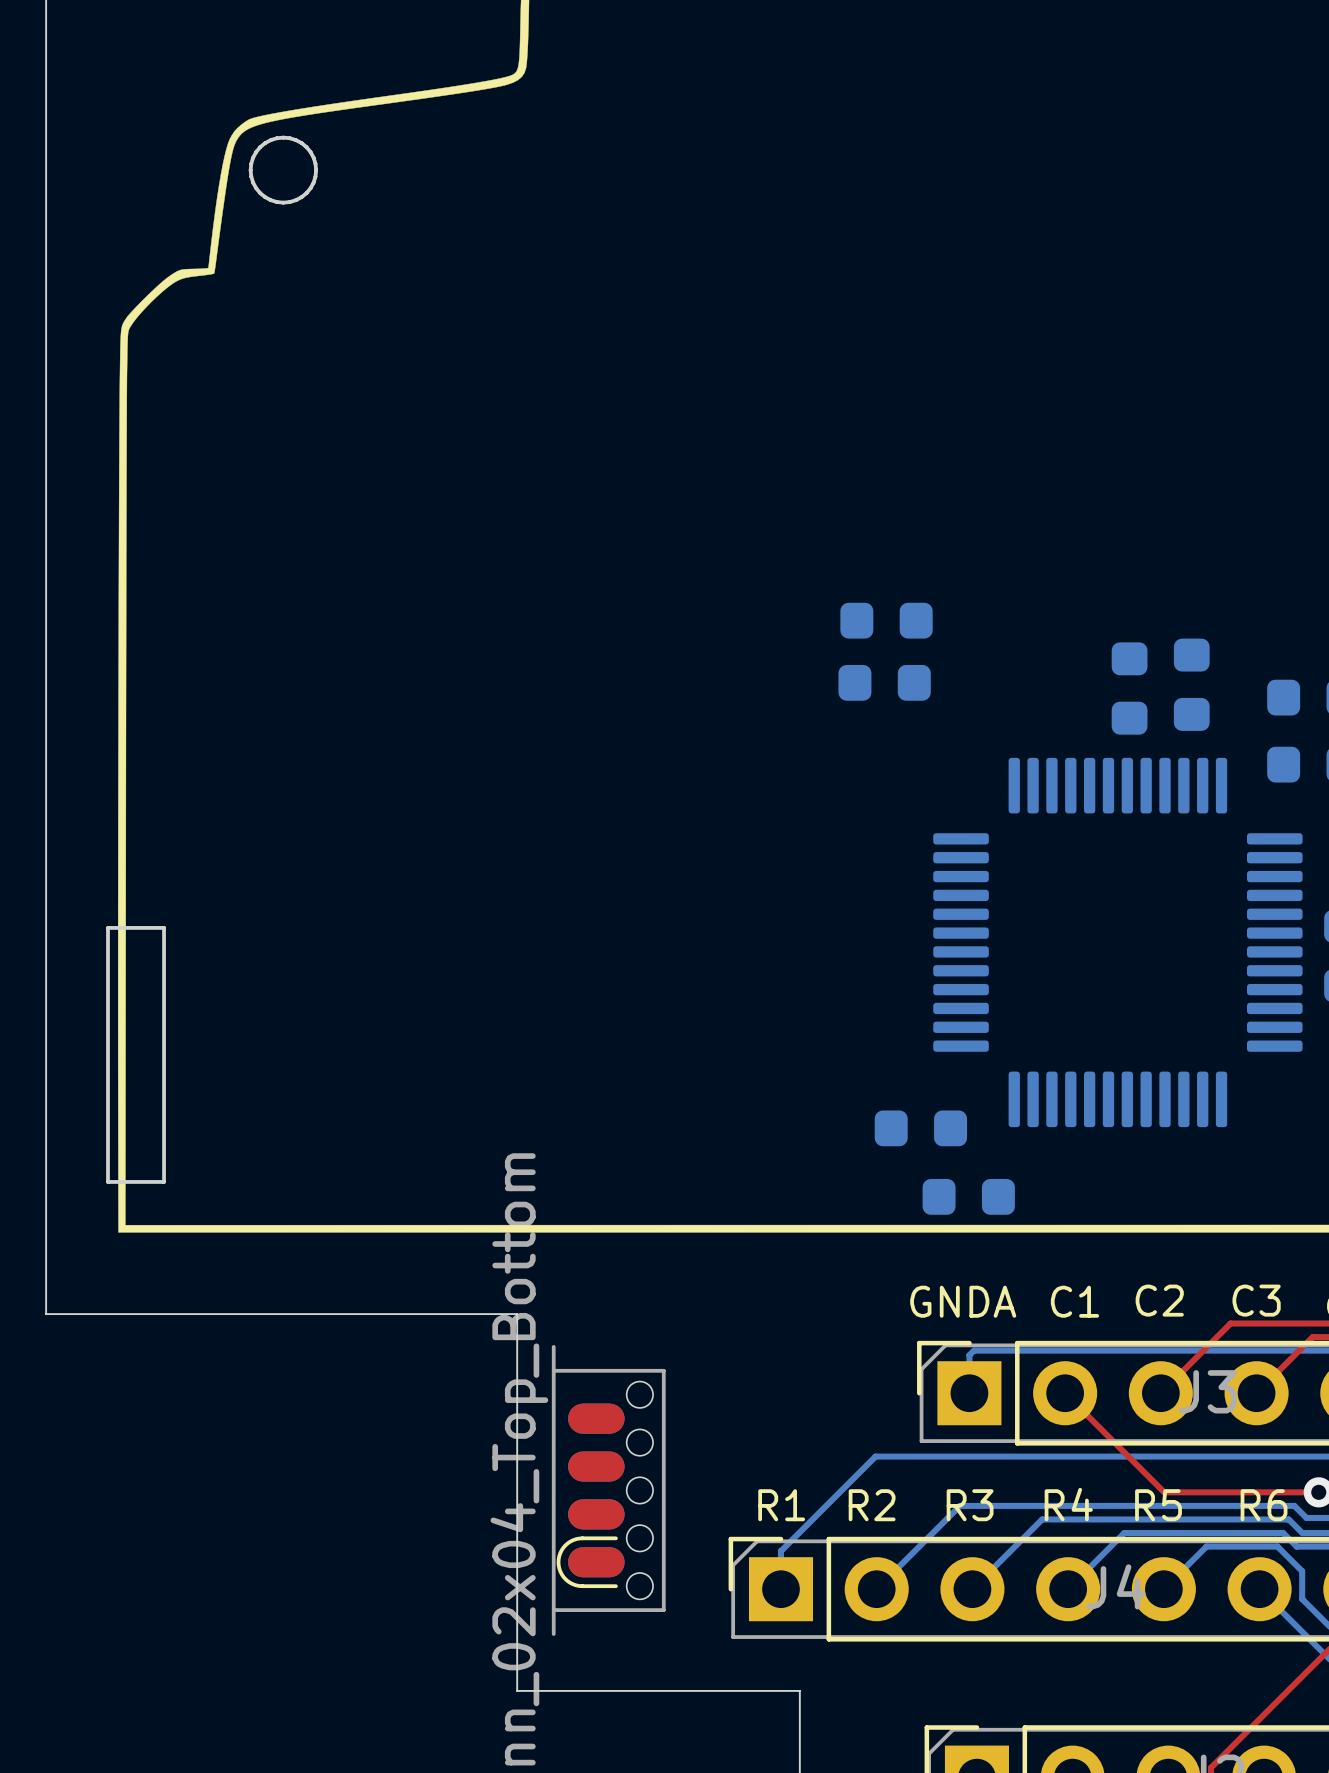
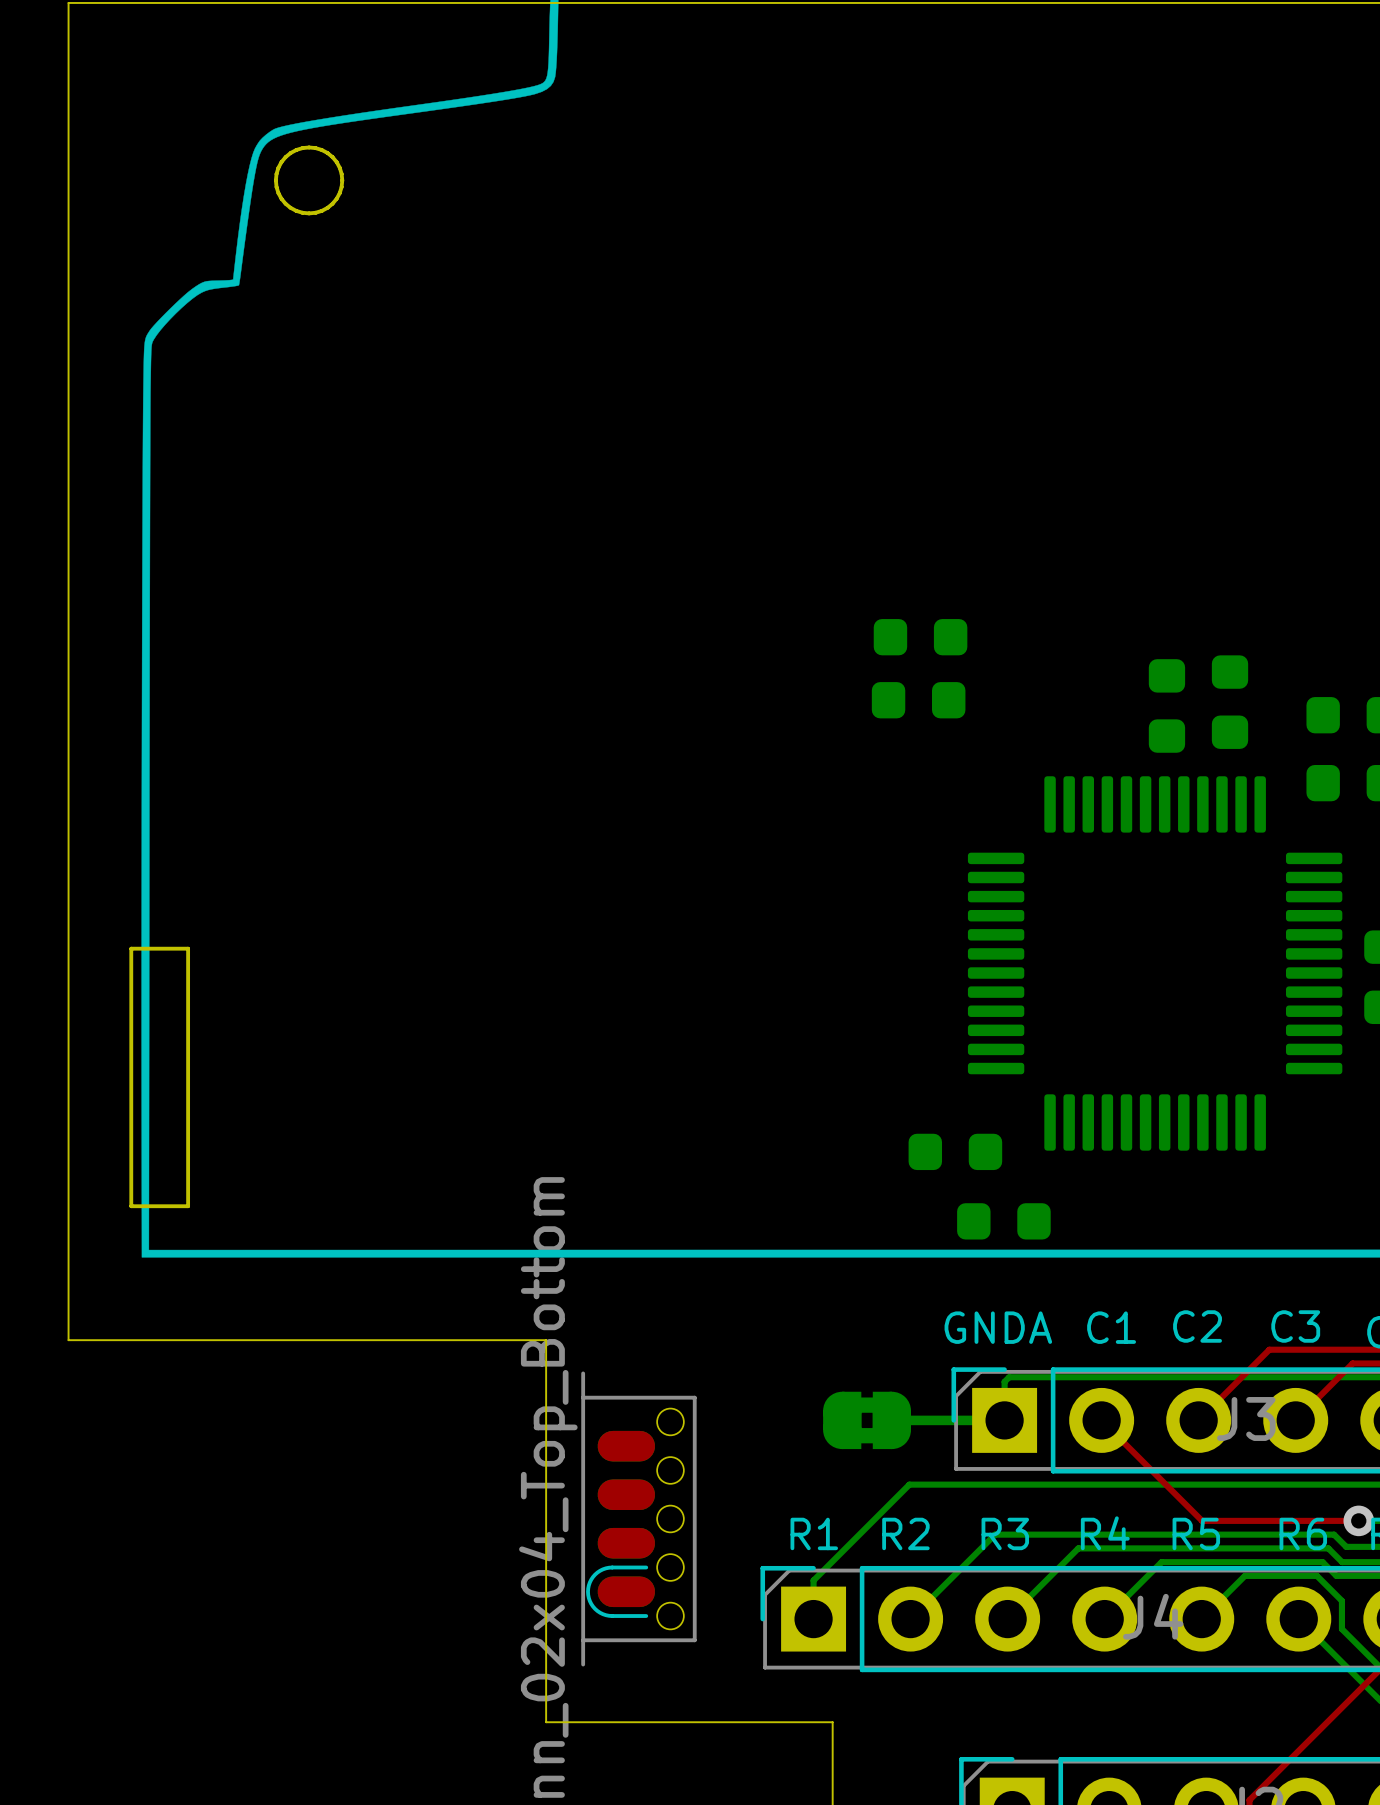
part: none -> (867, 1420)
bottom track: none -> (891, 1420) (1004, 1420)

